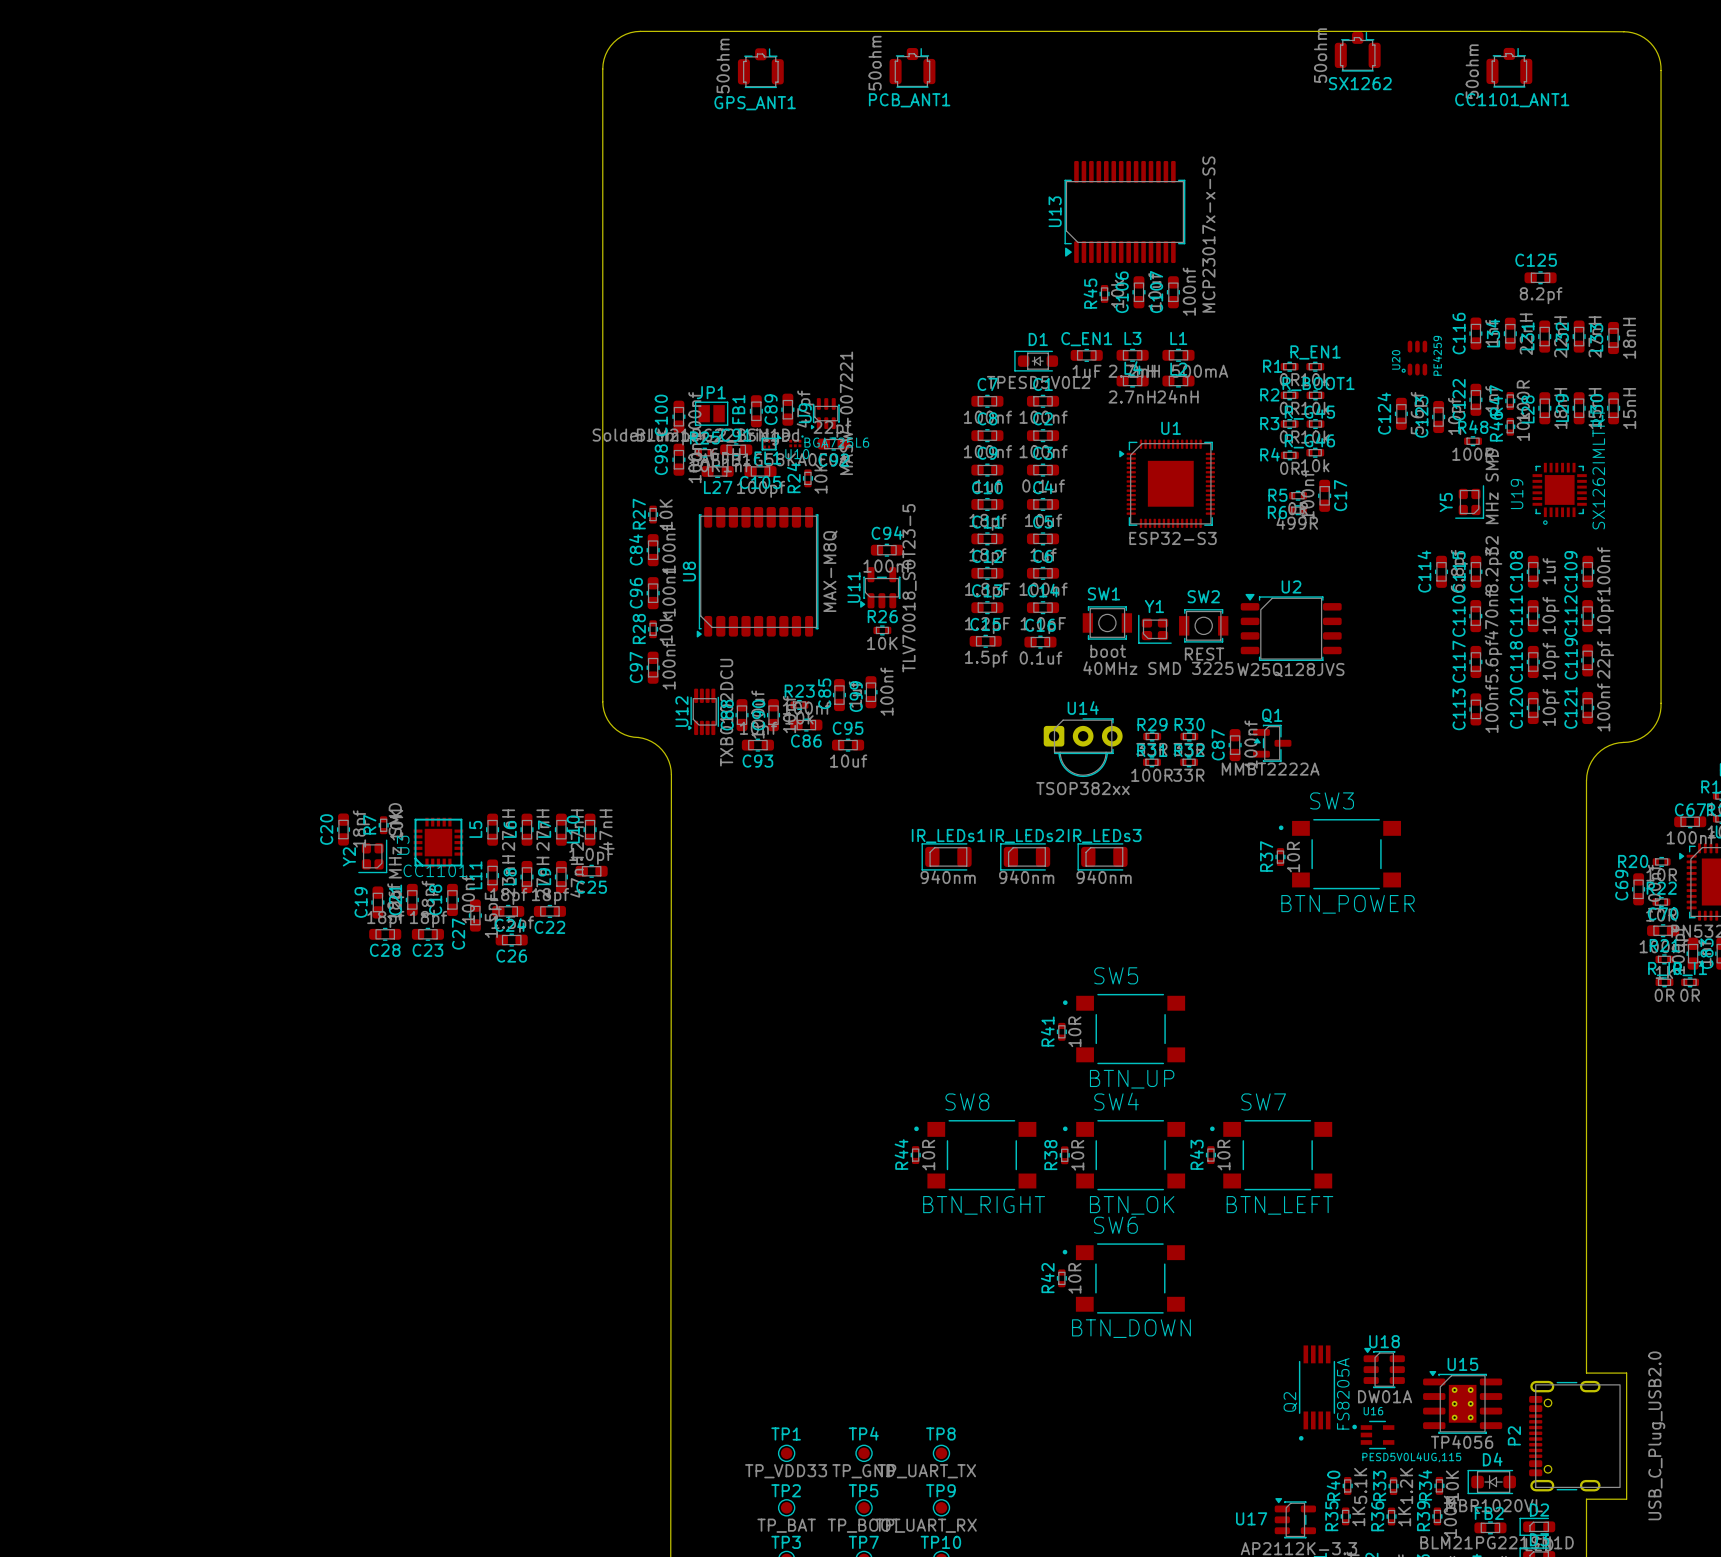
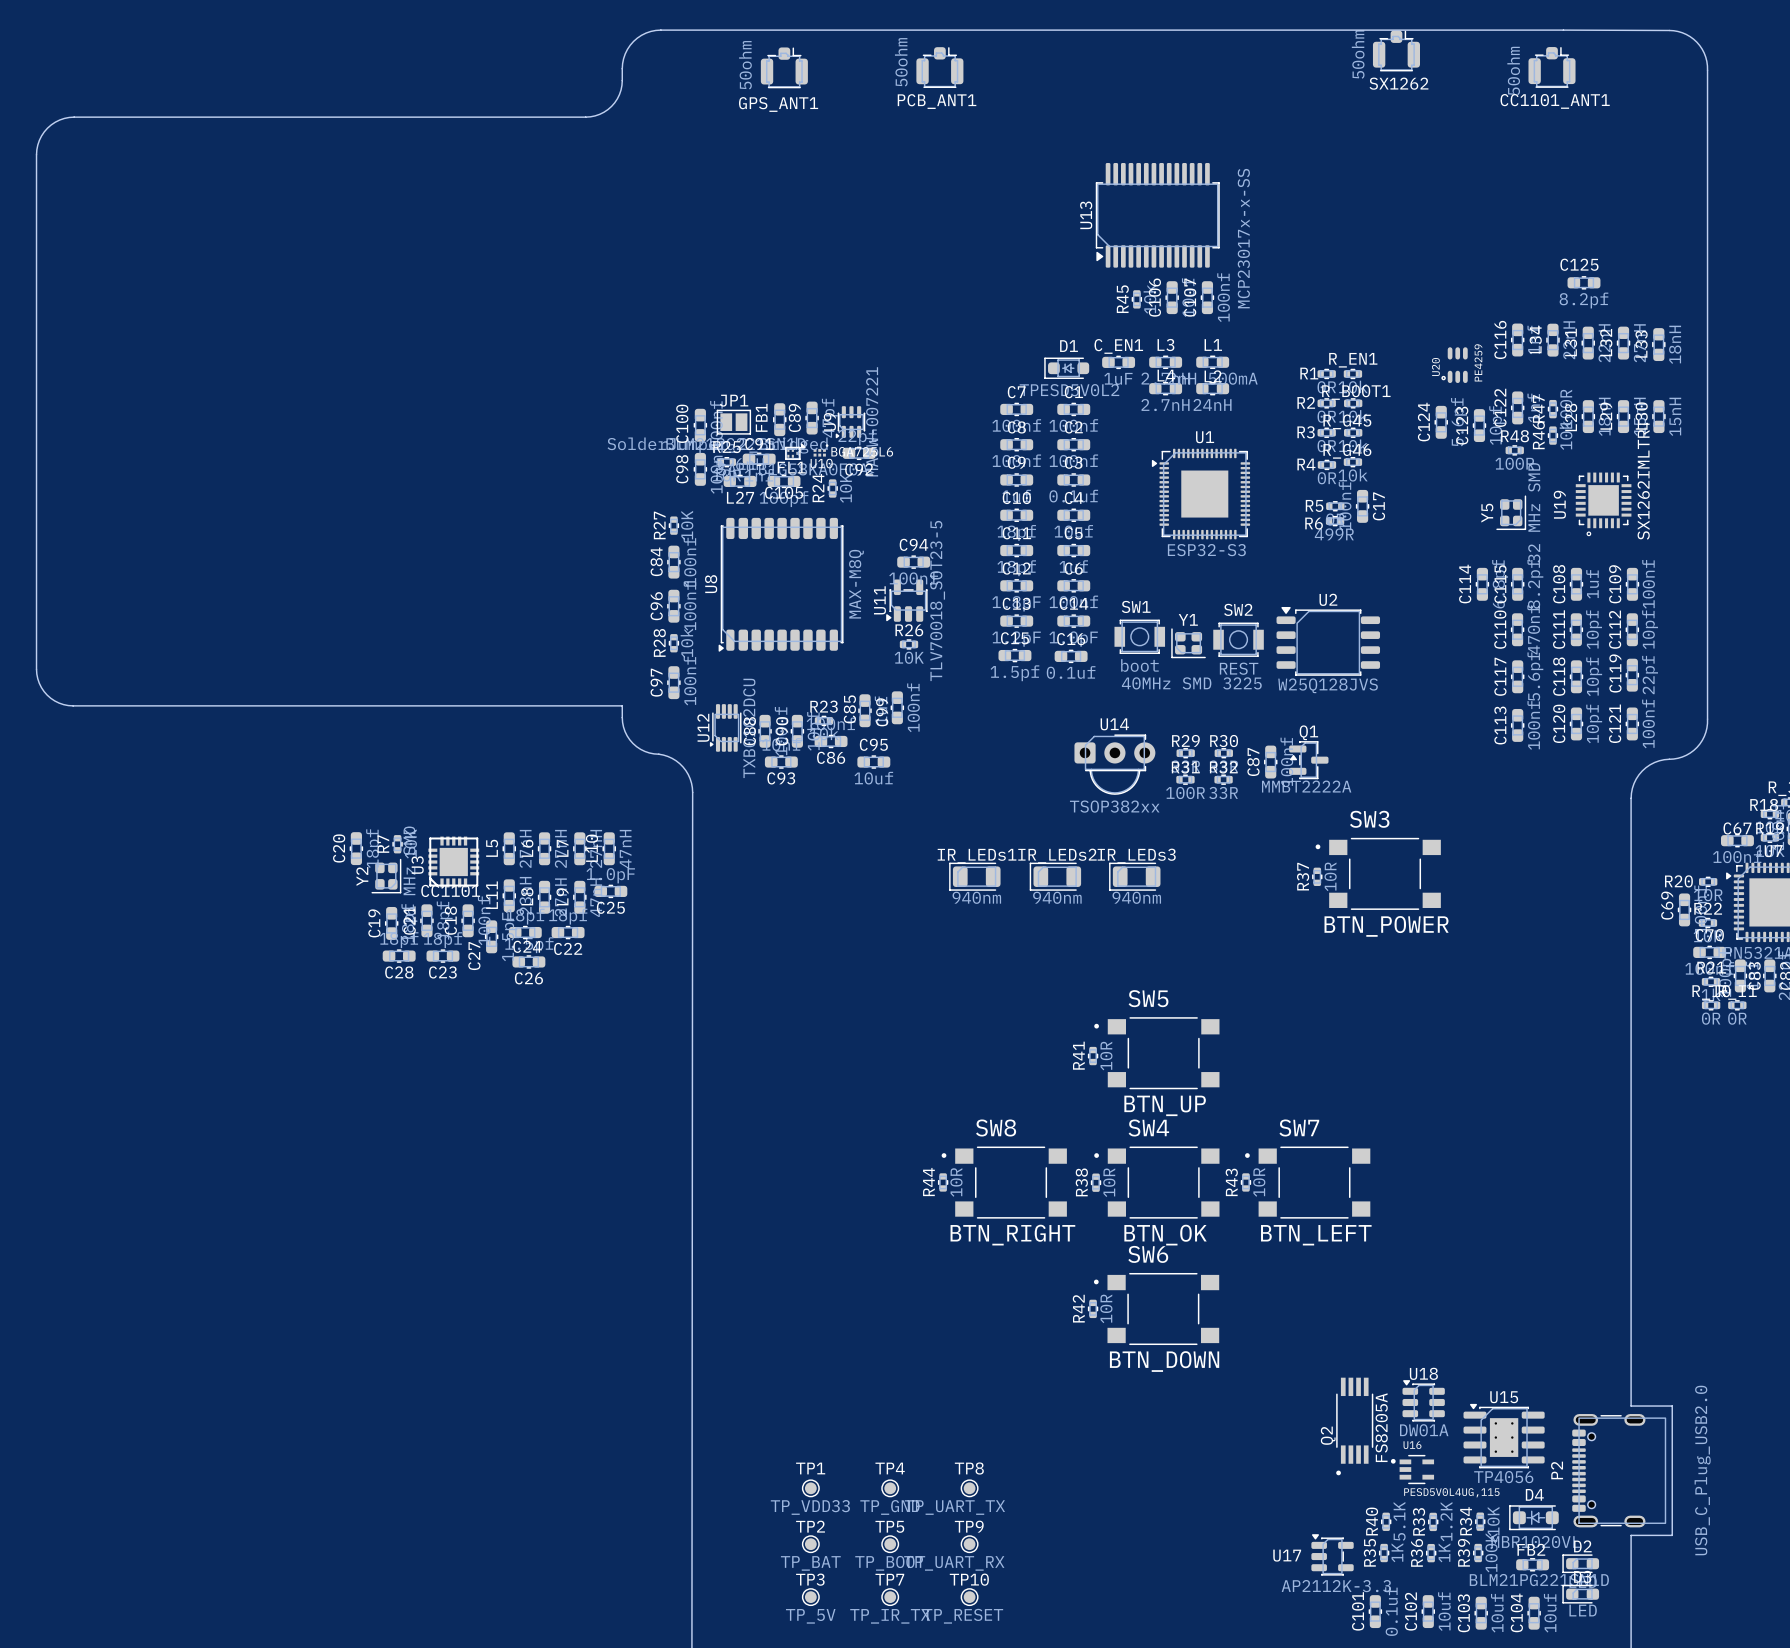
board edge: (602, 80) (602, 690) -> (622, 80) (619, 94) (611, 106) (603, 112) (590, 116) (69, 117) (55, 122) (47, 128) (39, 140) (36, 154) (36, 669) (39, 683) (47, 695) (59, 703) (73, 705) (622, 705)

